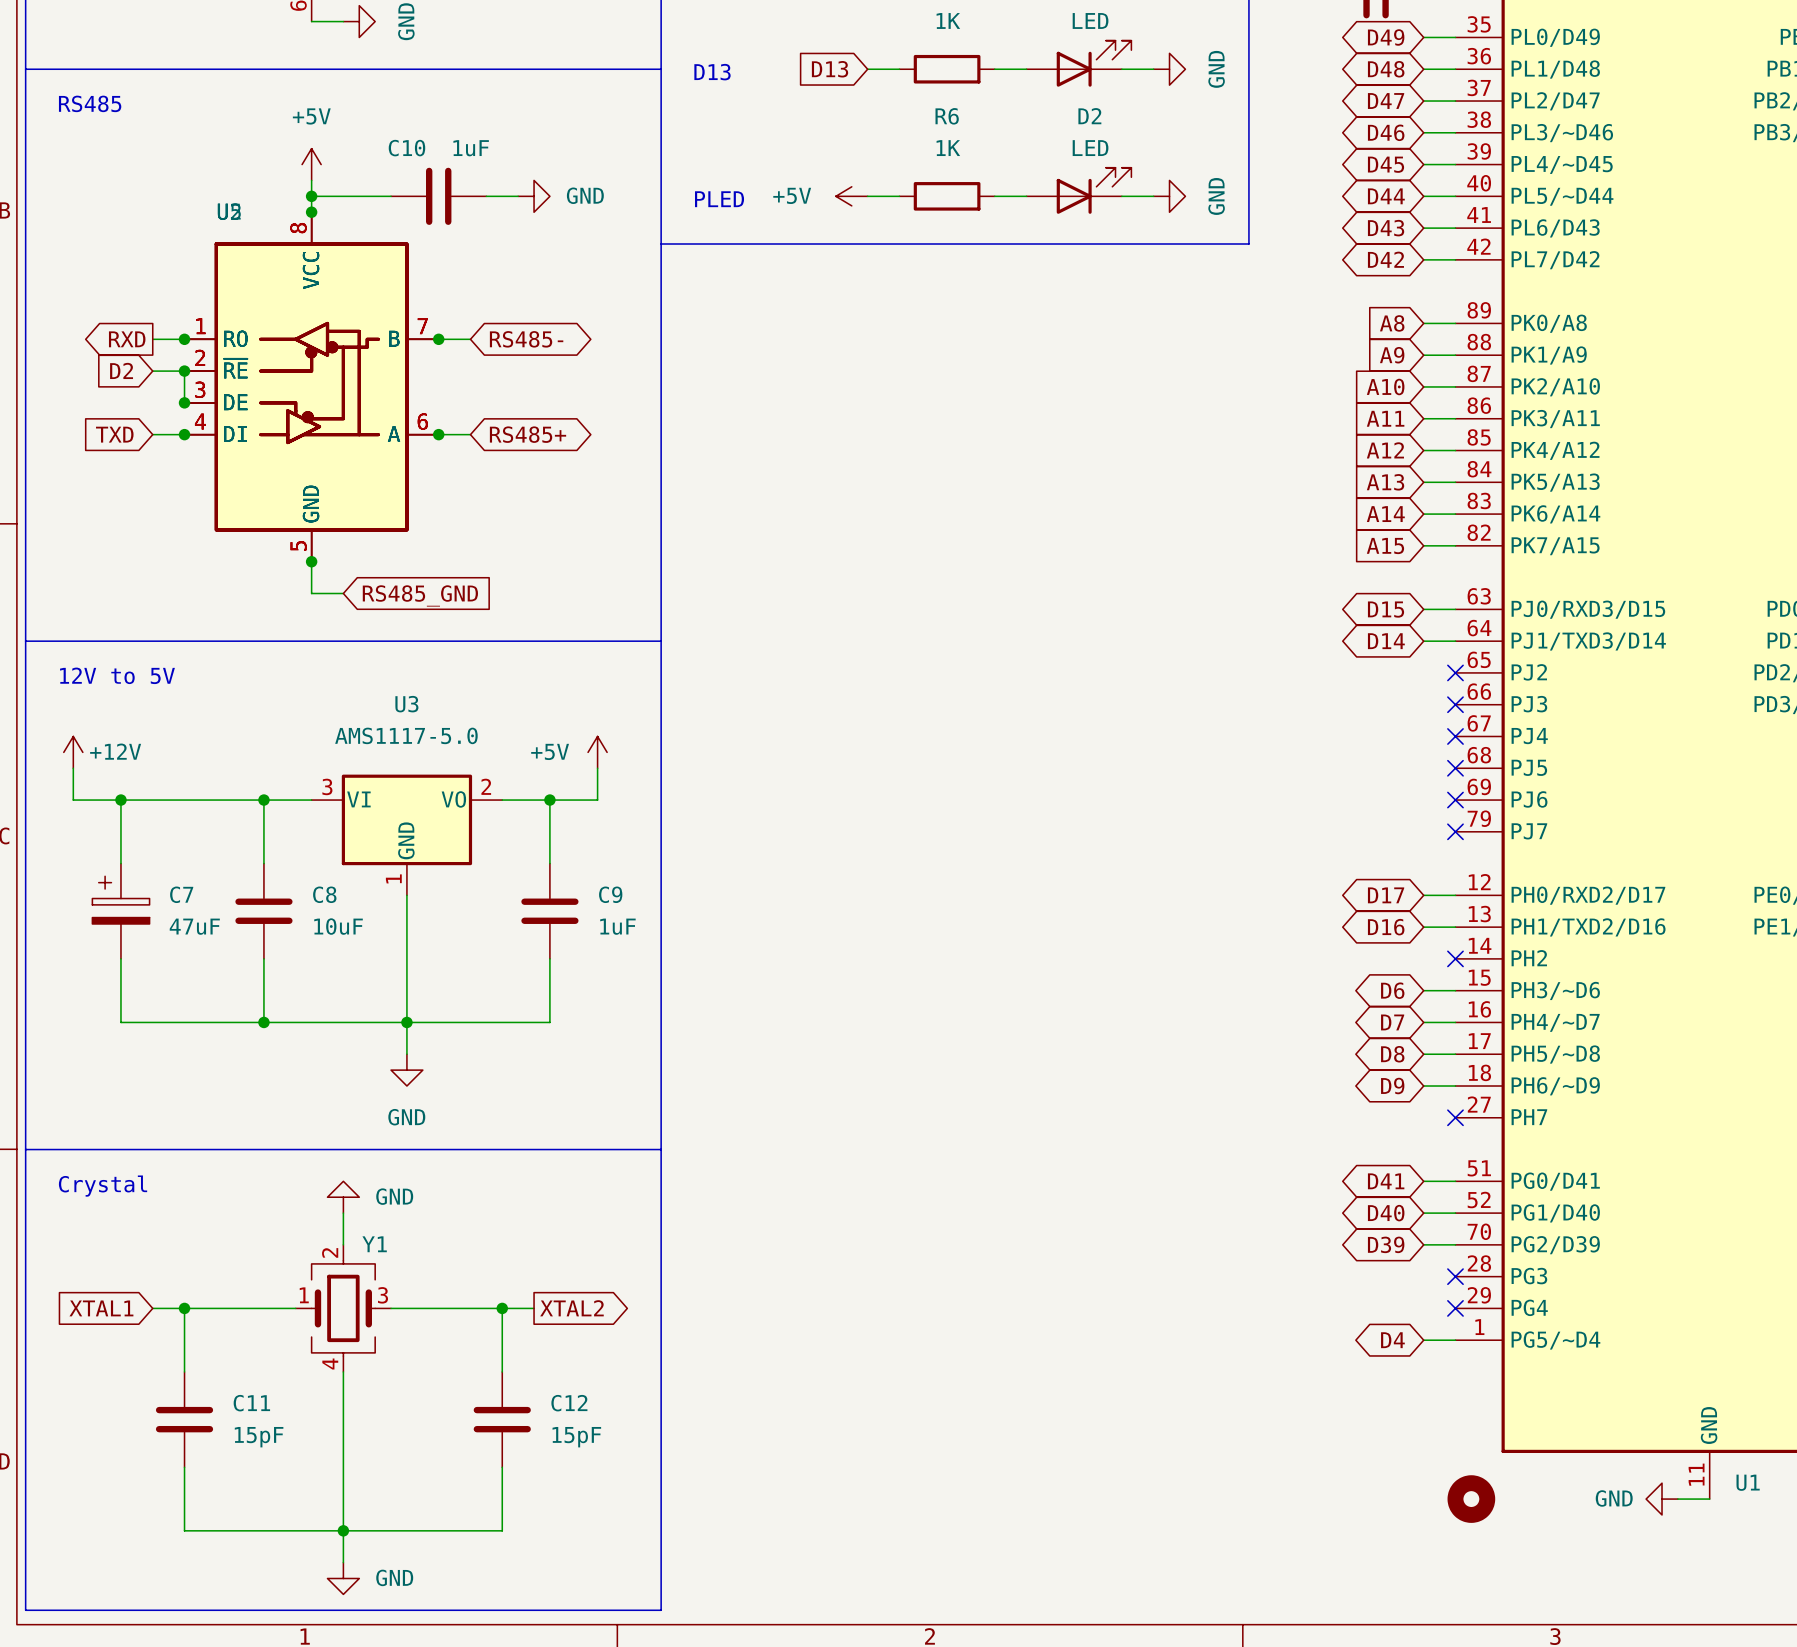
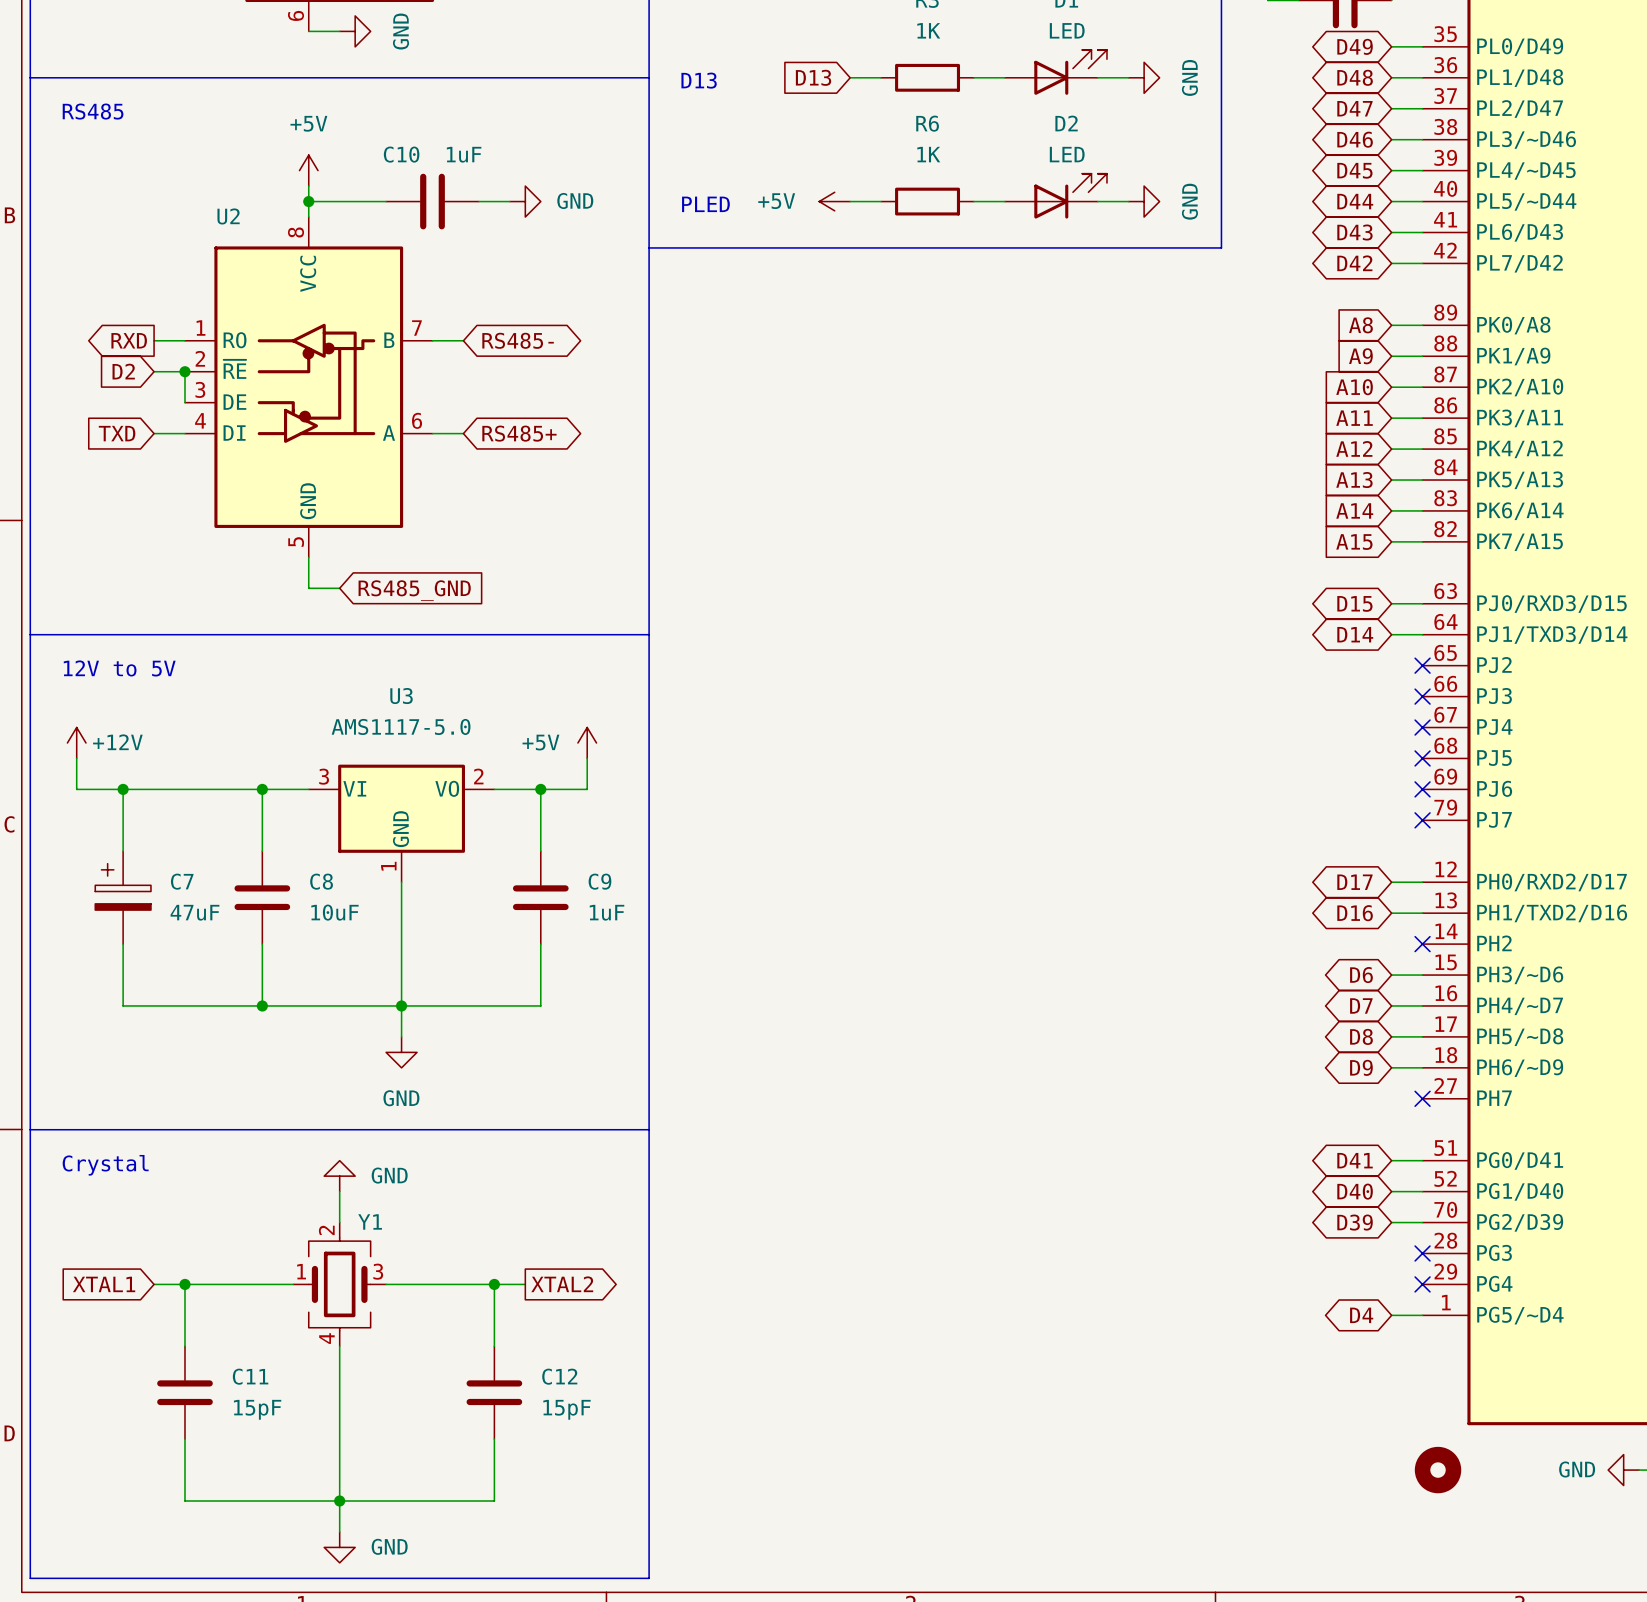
junction: (311, 212) -> none
junction: (184, 339) -> none
junction: (438, 339) -> none
part: (311, 386) -> none
junction: (184, 402) -> none
junction: (184, 434) -> none
junction: (438, 434) -> none
junction: (311, 561) -> none

